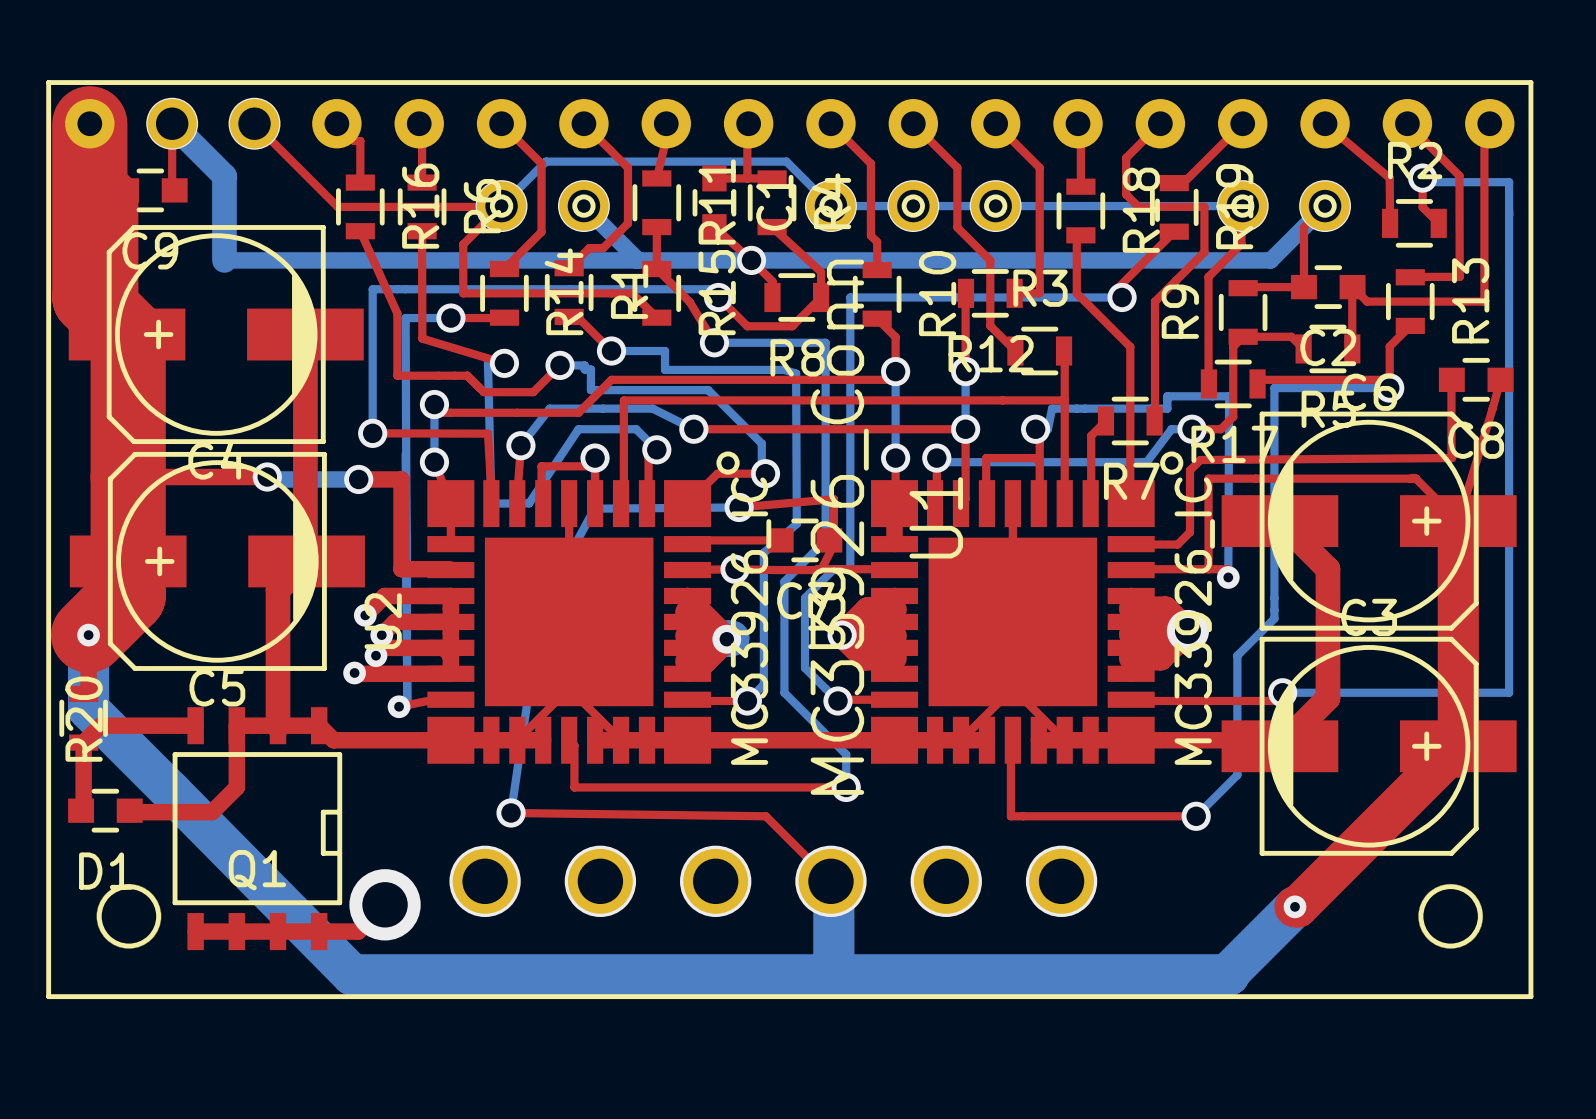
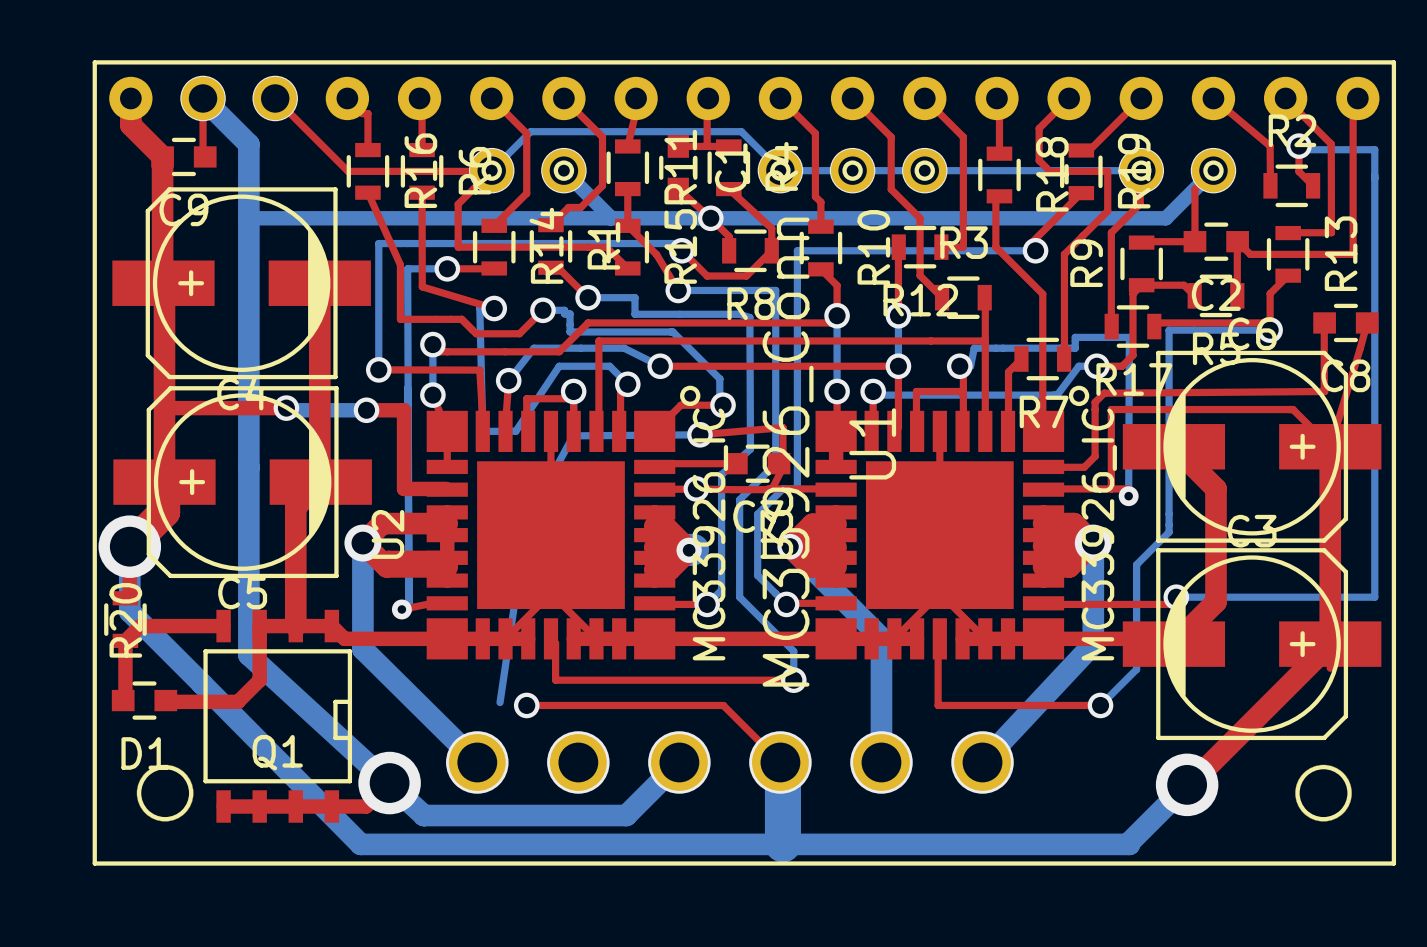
top track: (89, 123) (89, 297) (127, 334) -> none
bottom track: none -> (248, 218) (248, 654) (423, 815) (626, 815) (679, 762)
top track width: thick (128, 335) (128, 595) (88, 635) -> thin (164, 284) (164, 511) (129, 546)
top track width: thick (1458, 521) (1458, 746) (1297, 906) (1295, 906) -> thin (1330, 446) (1330, 644) (1189, 784) (1187, 784)
top track: (450, 595) (384, 595) (365, 615) -> none
top track: none -> (447, 523) (382, 523) (362, 543) (386, 566) (447, 566)
via: (365, 615) -> none
top track: (450, 621) (394, 621) (381, 635) -> none
via size: [77, 623, 100, 647] -> [98, 515, 162, 578]
bottom track: none -> (362, 543) (362, 649) (477, 762)
via: none -> (362, 543)
bottom track: none -> (1093, 543) (1093, 644) (982, 762)
bottom track width: thick (88, 635) (88, 709) (352, 974) (1229, 974) (1295, 906) -> thin (129, 546) (129, 611) (360, 844) (1129, 844) (1187, 784)
via: (381, 635) -> none
bottom track: none -> (790, 546) (881, 637) (881, 762)
via: (375, 655) -> none
top track: (354, 672) (450, 673) -> none
via: (354, 672) -> none
top track: (511, 812) (765, 816) -> (526, 705) (723, 705)
via position: (511, 812) -> (526, 705)
via size: [1283, 895, 1307, 919] -> [1155, 753, 1219, 817]

